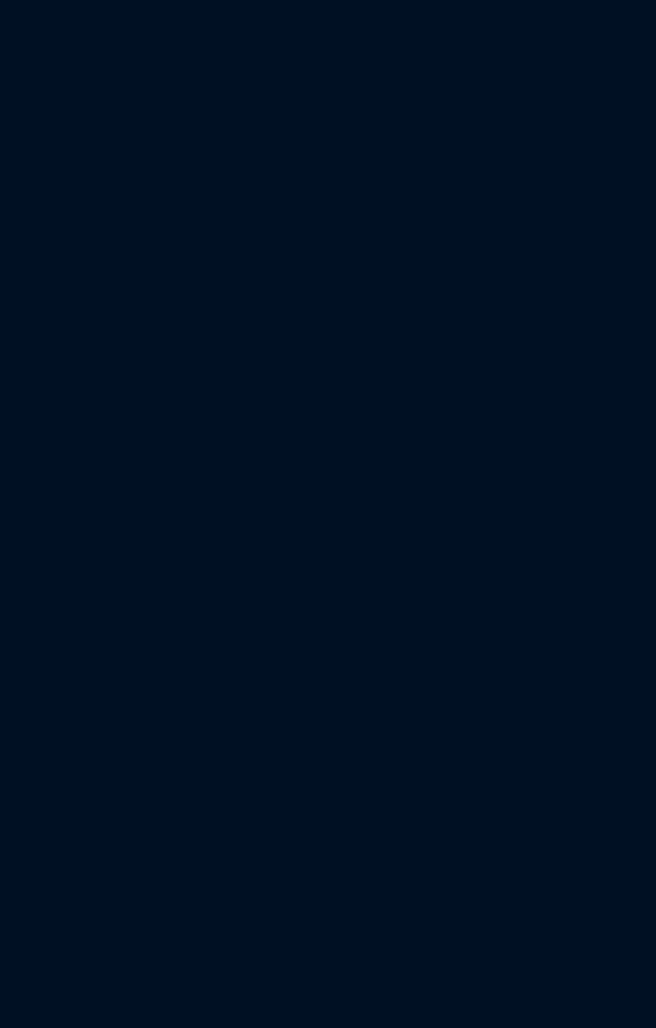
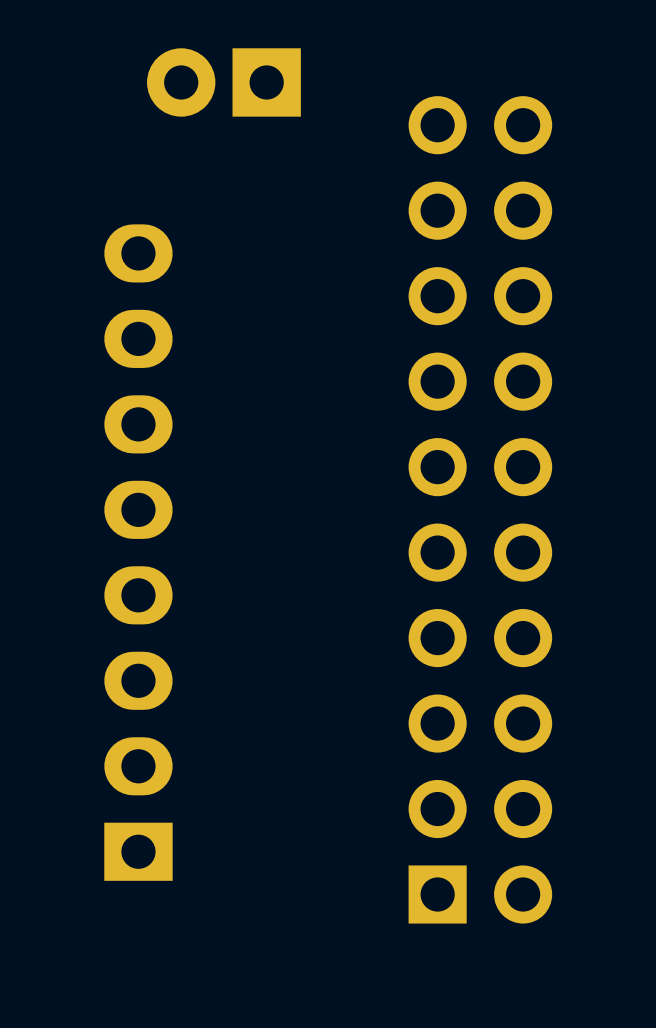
part: none -> (223, 82)
part: none -> (480, 509)
part: none -> (138, 552)

